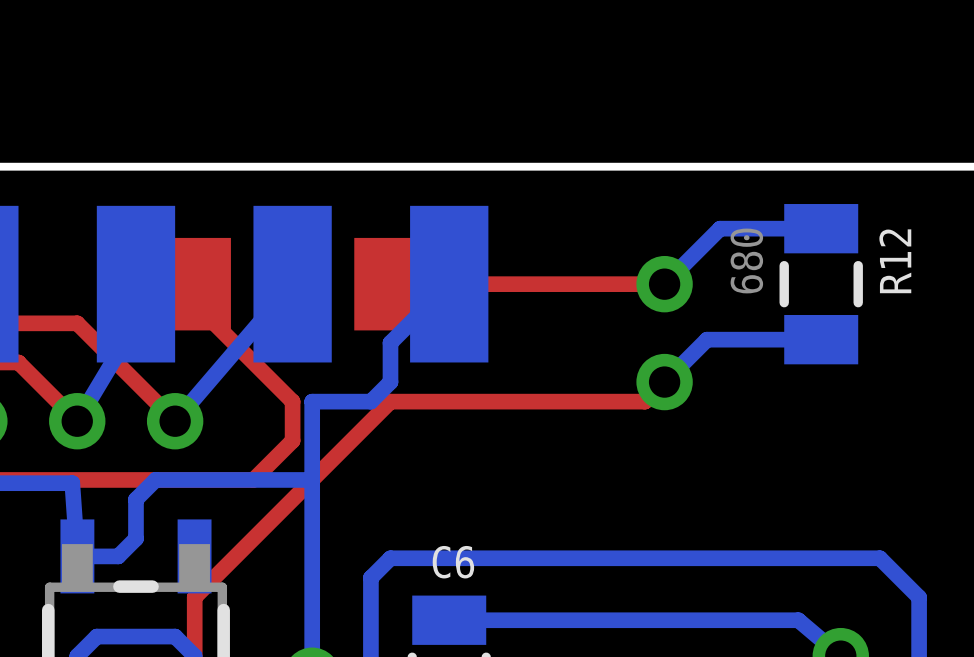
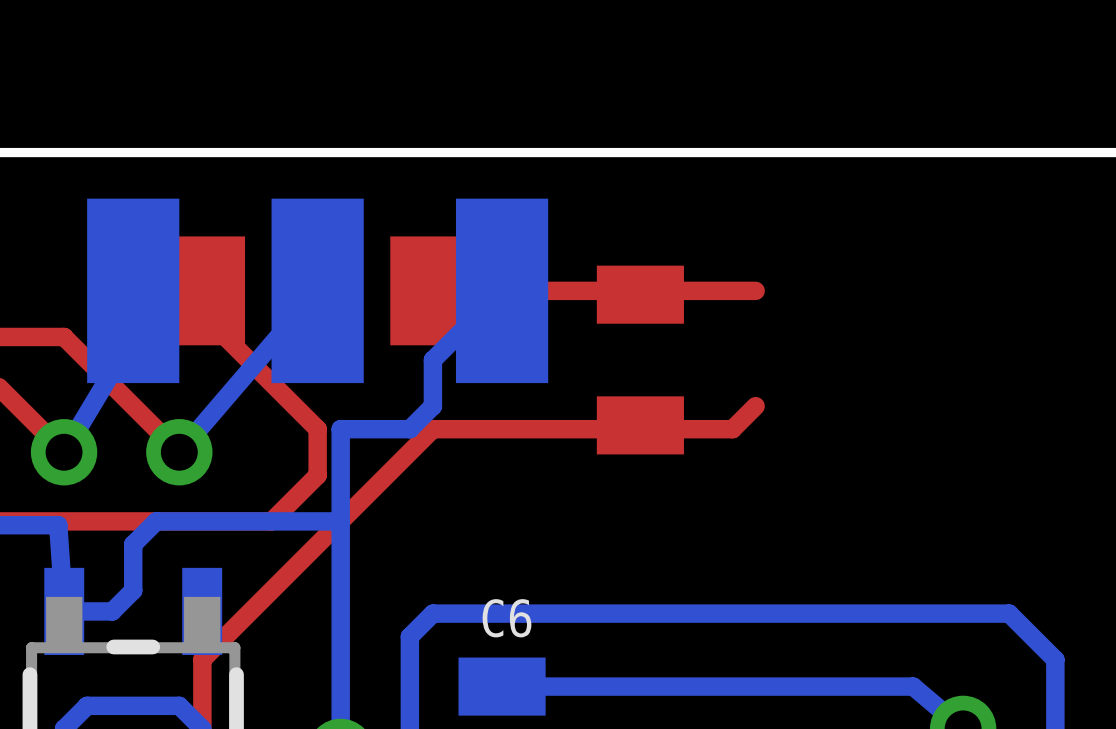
bottom track: (821, 228) (720, 228) (664, 284) -> none
via: (664, 284) -> none
R12 side: bottom (821, 284) -> top (640, 360)
bottom track: (821, 339) (706, 339) (664, 382) -> none
via: (664, 382) -> none

